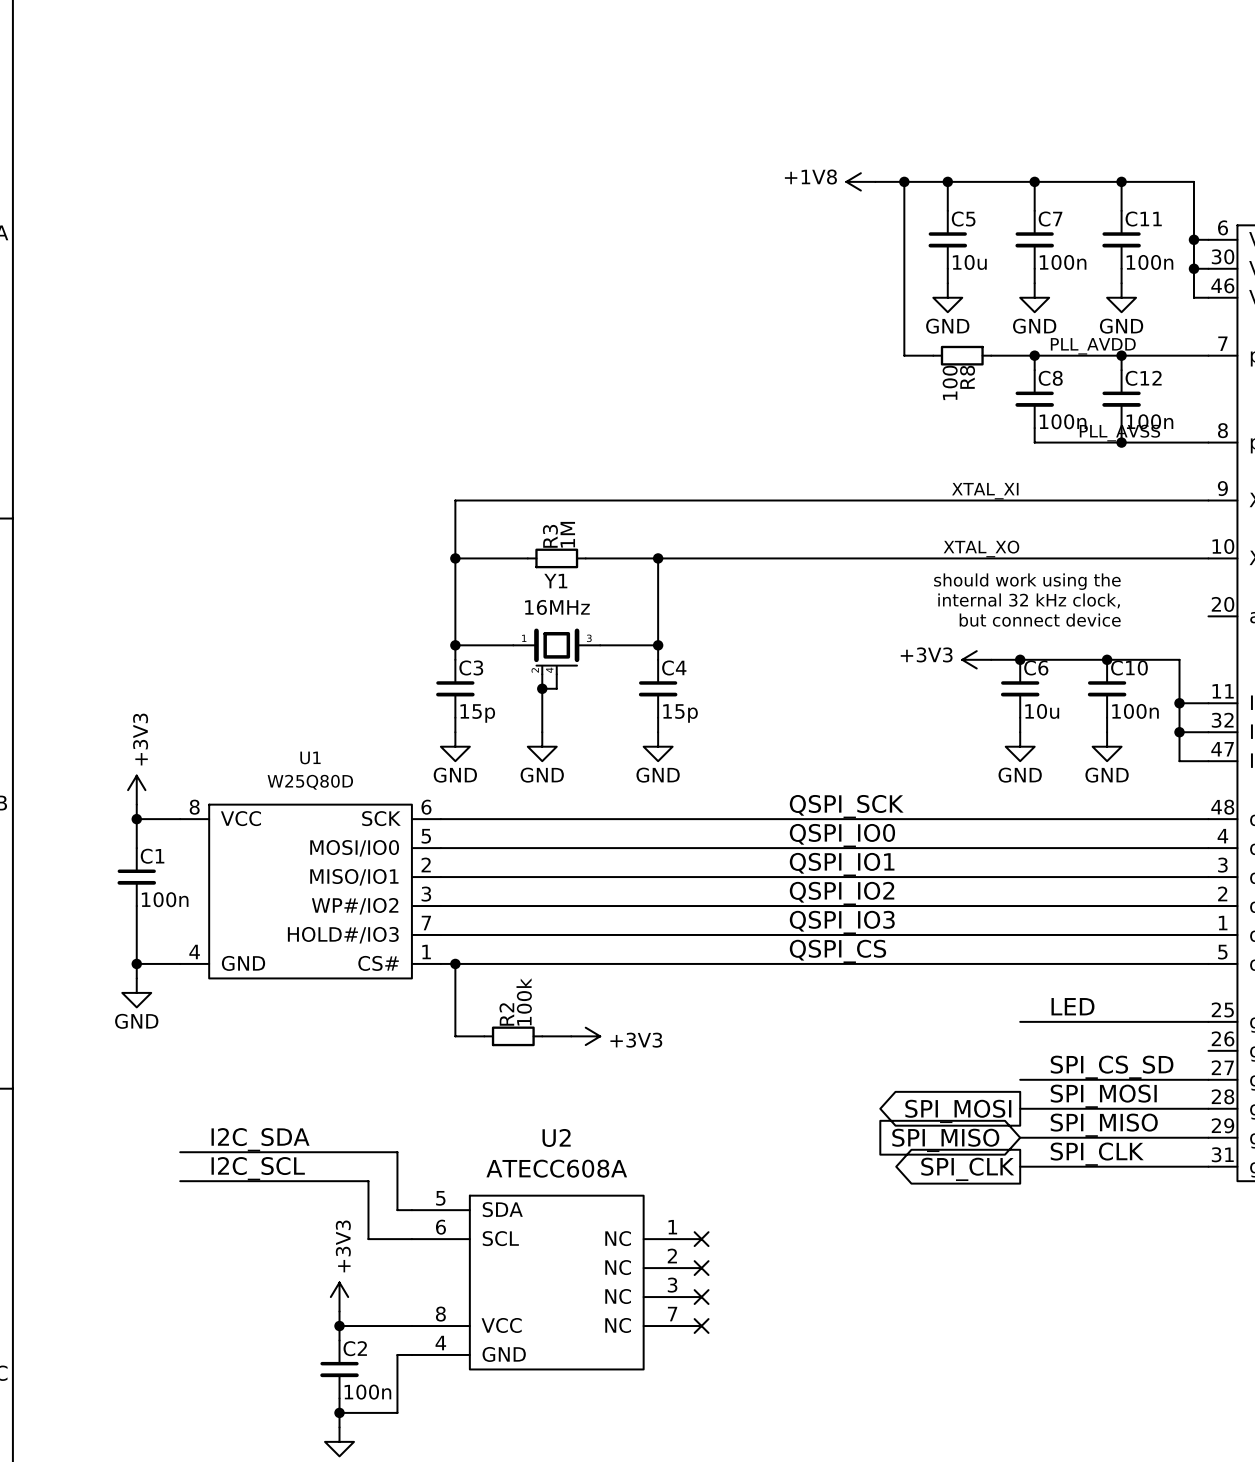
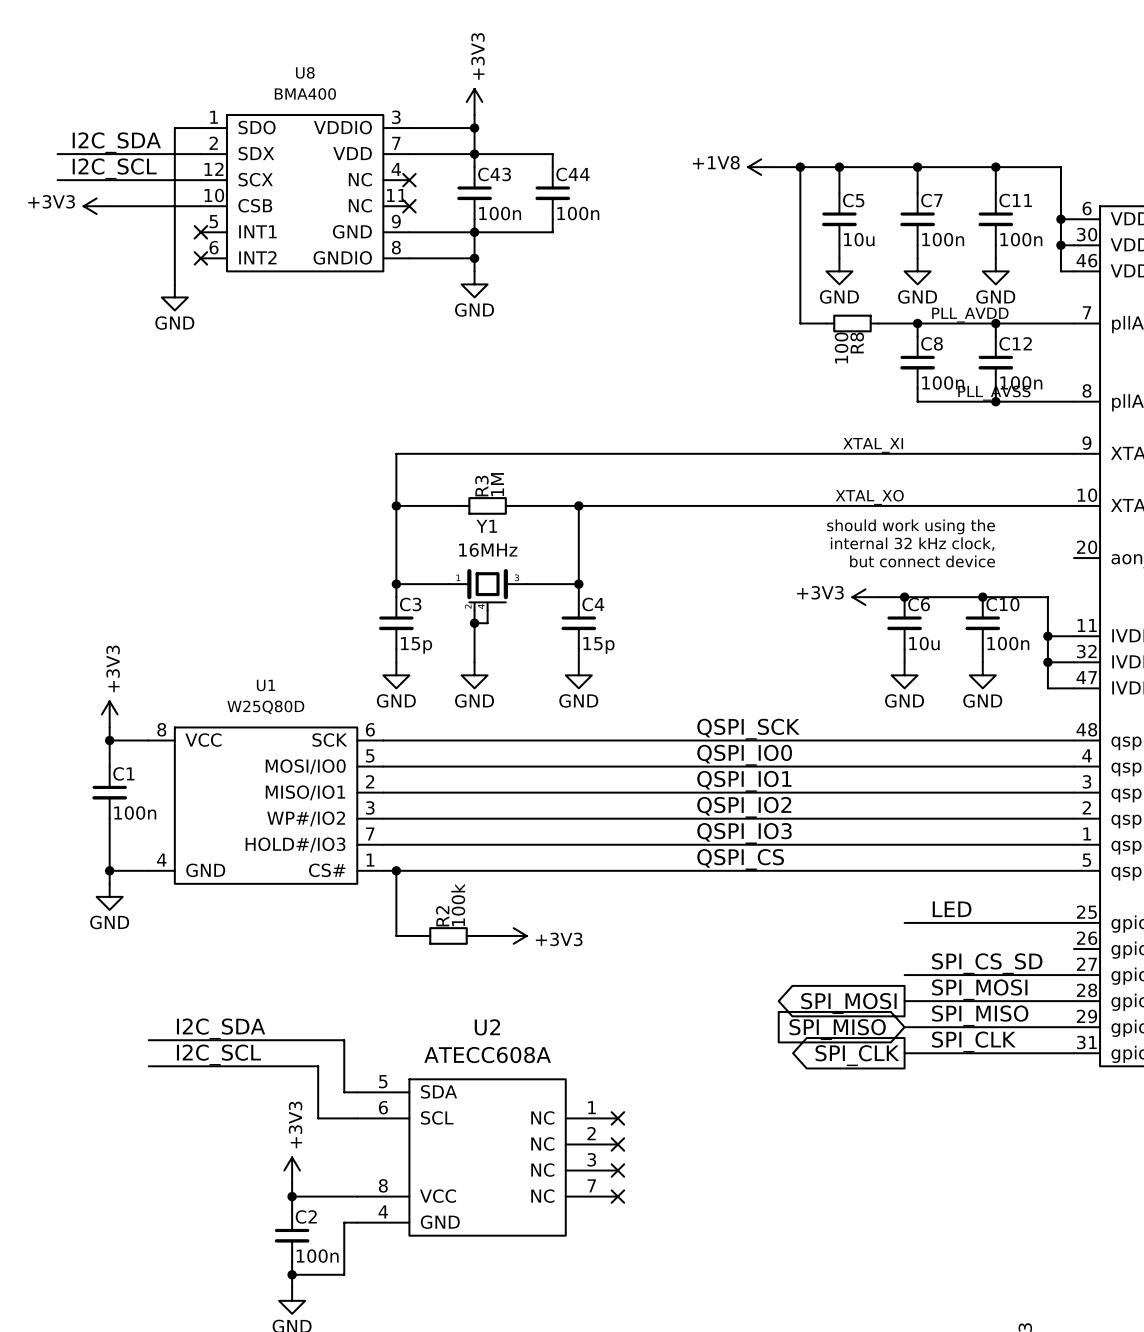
power symbol: none -> +3V3 (474, 101)
wire: none -> (474, 115) (474, 167)
wire: none -> (200, 128) (174, 128) (174, 284)
wire: none -> (409, 128) (474, 128)
junction: none -> (474, 128)
label: none -> I2C_SDA (116, 142)
wire: none -> (57, 154) (200, 154)
wire: none -> (409, 154) (552, 154) (552, 167)
junction: none -> (474, 154)
label: none -> I2C_SCL (114, 168)
wire: none -> (57, 180) (200, 180)
no-connect mark: none -> (409, 180)
U8: none -> BMA400 (305, 193)
C43: none -> 100n (474, 193)
C44: none -> 100n (552, 193)
power symbol: none -> +3V3 (96, 206)
wire: none -> (109, 206) (200, 206)
no-connect mark: none -> (409, 206)
wire: none -> (474, 219) (474, 271)
wire: none -> (552, 219) (552, 232) (409, 232)
no-connect mark: none -> (200, 232)
junction: none -> (474, 232)
no-connect mark: none -> (200, 258)
wire: none -> (409, 258) (474, 258)
junction: none -> (474, 258)
power symbol: none -> GND (474, 284)
power symbol: none -> GND (174, 297)

